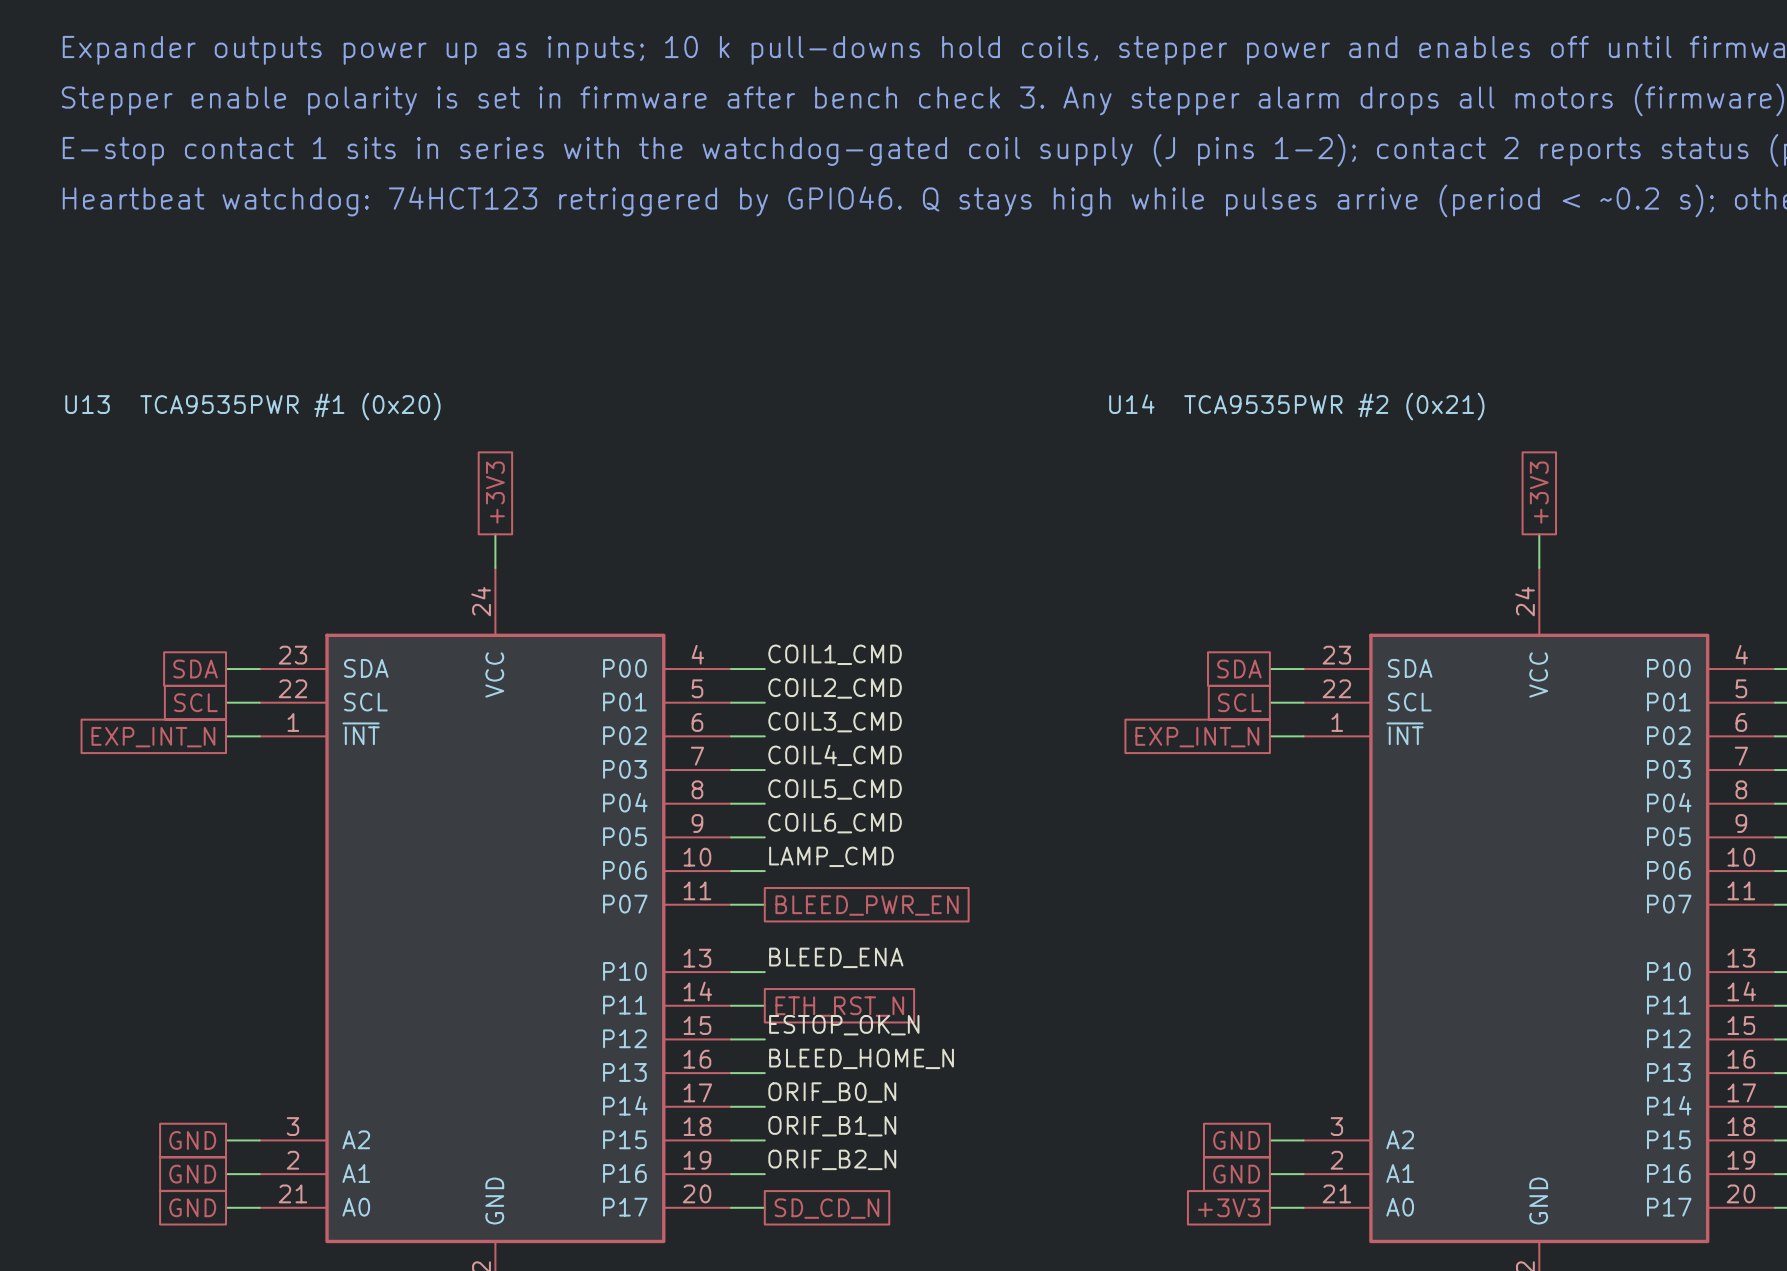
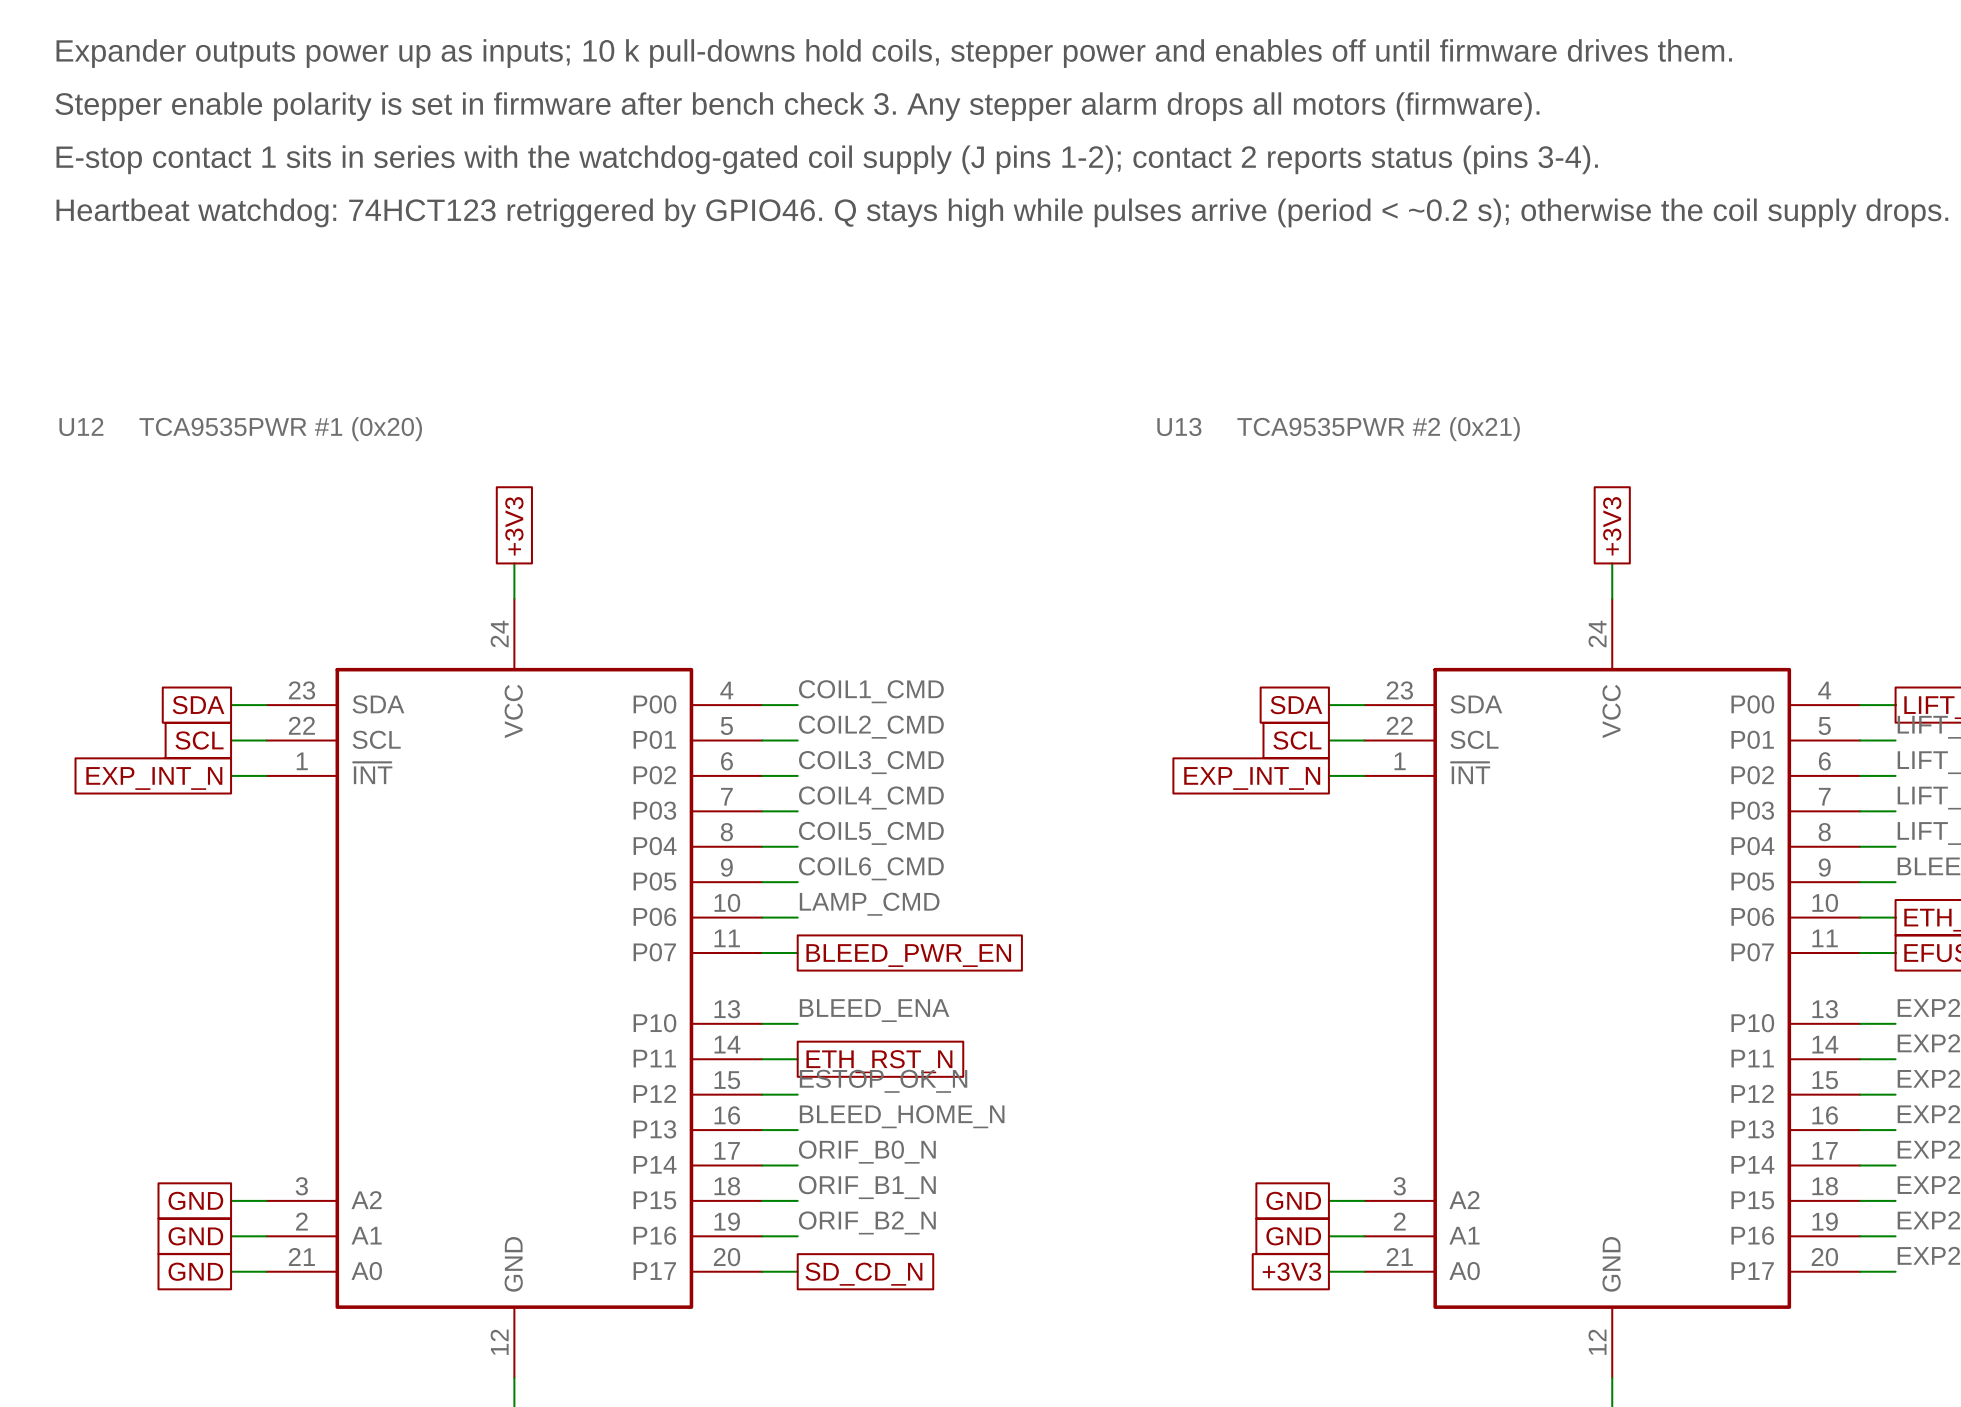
U13 name: U13 (87, 404) -> U12 (81, 426)
U14 name: U14 (1131, 404) -> U13 (1179, 426)

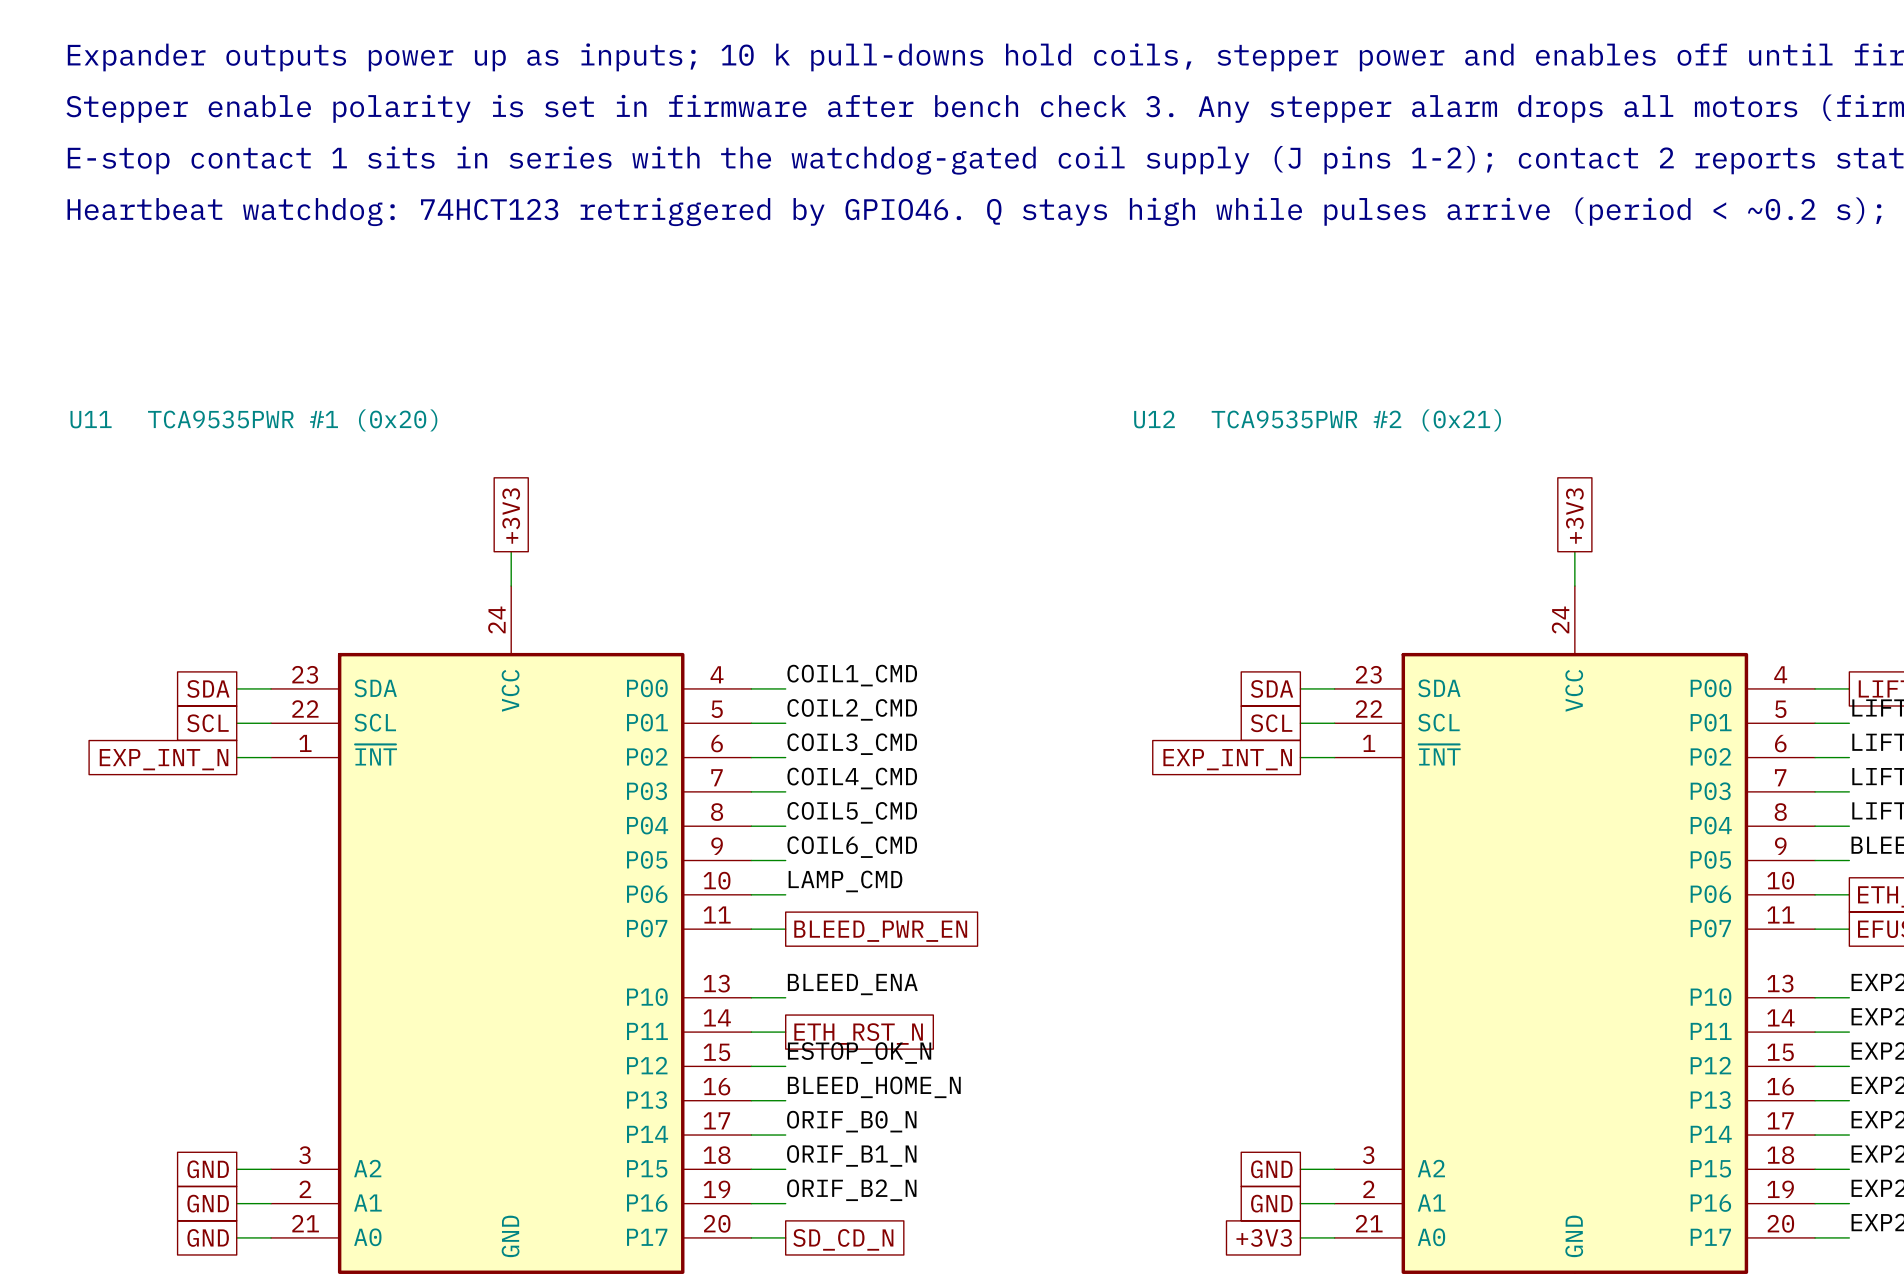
U12 name: U12 (81, 426) -> U11 (91, 419)
U13 name: U13 (1179, 426) -> U12 (1154, 419)

